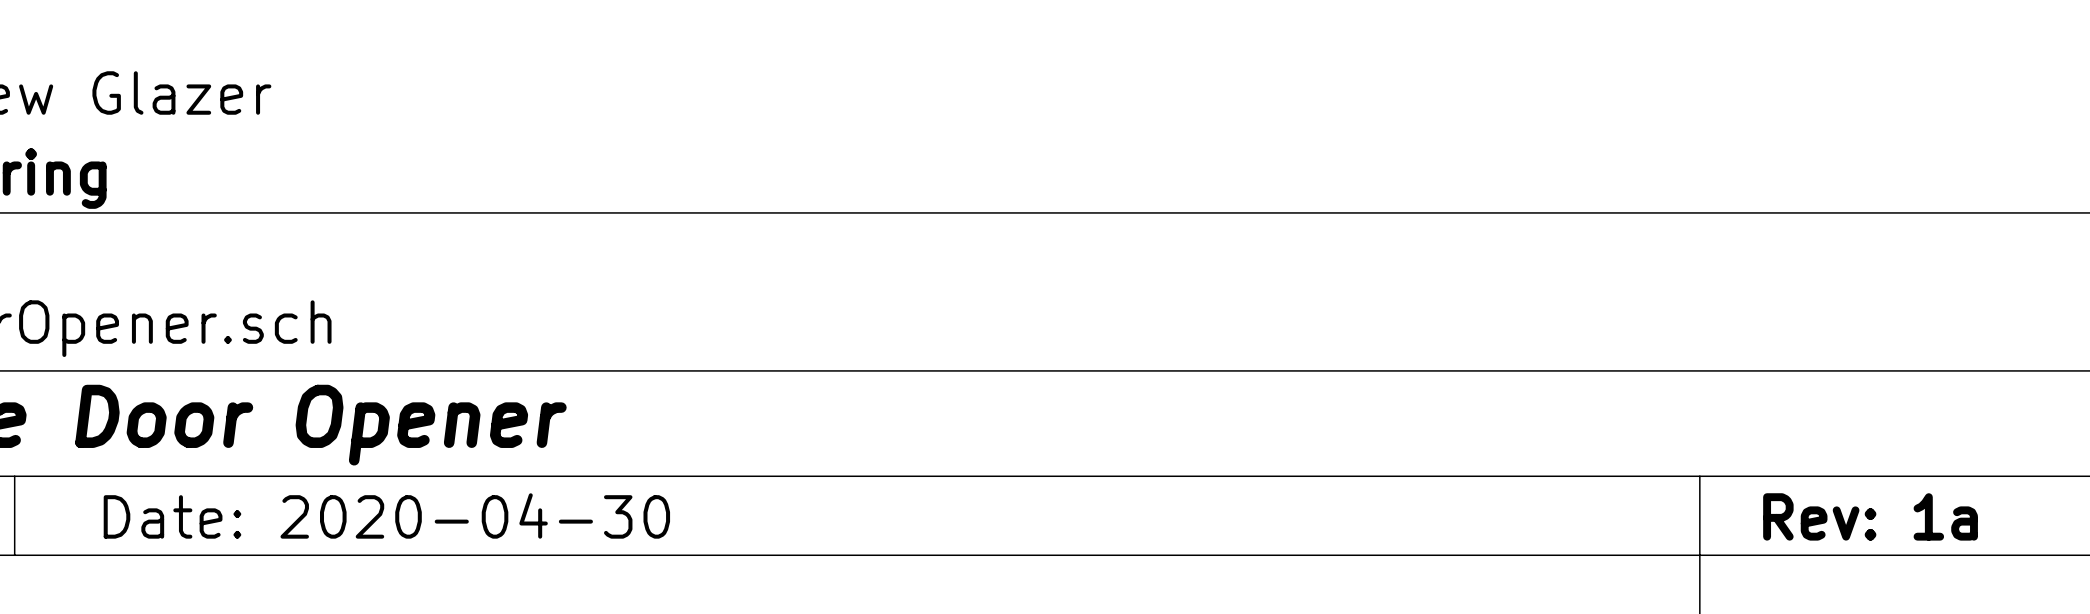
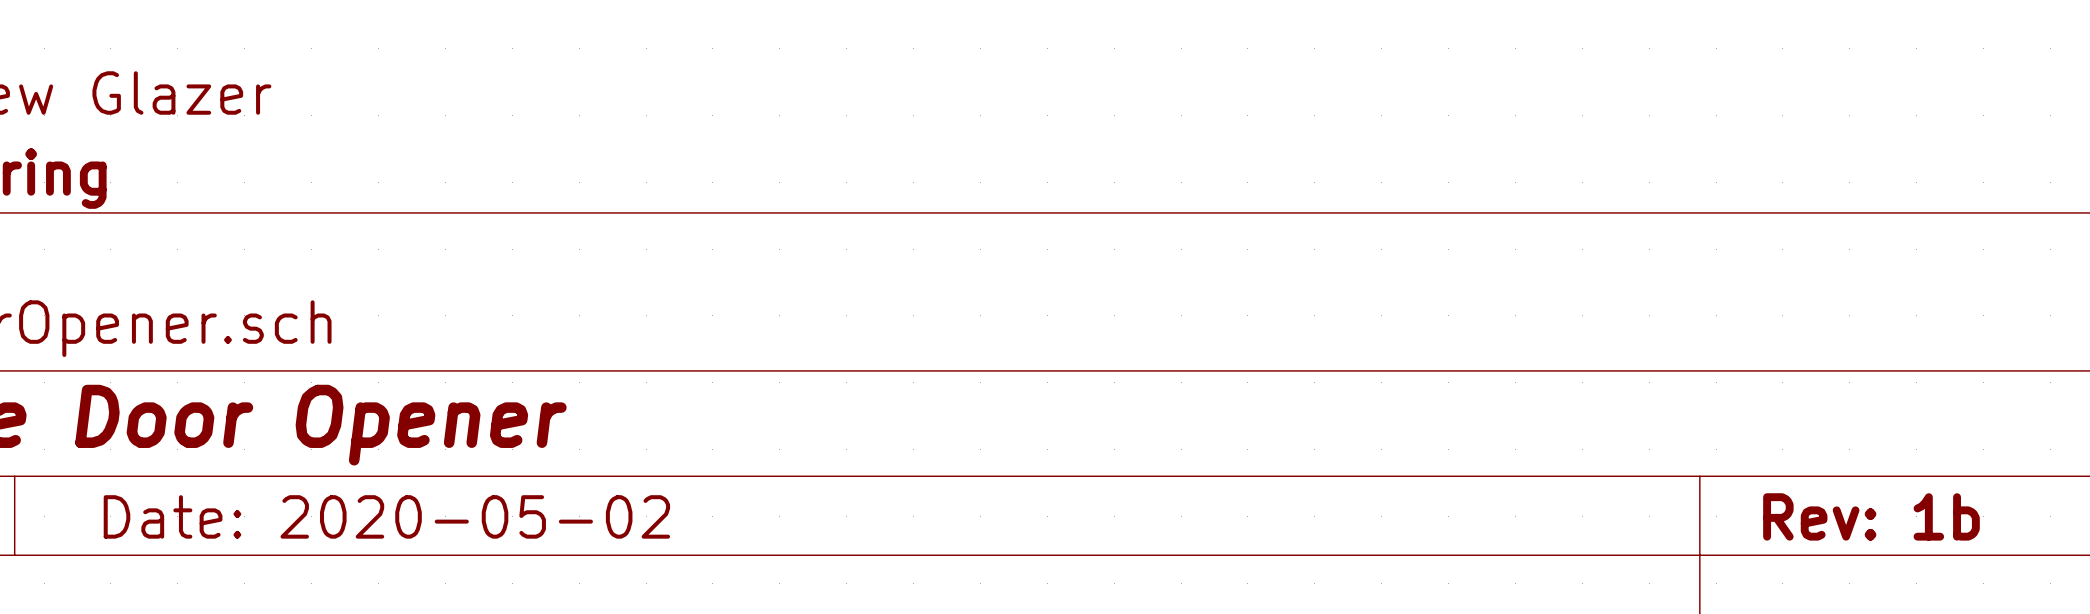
title block: Date: 2020-04-30 (386, 515) -> Date: 2020-05-02 (386, 516)
title block: Rev: 1a (1870, 516) -> Rev: 1b (1871, 516)

